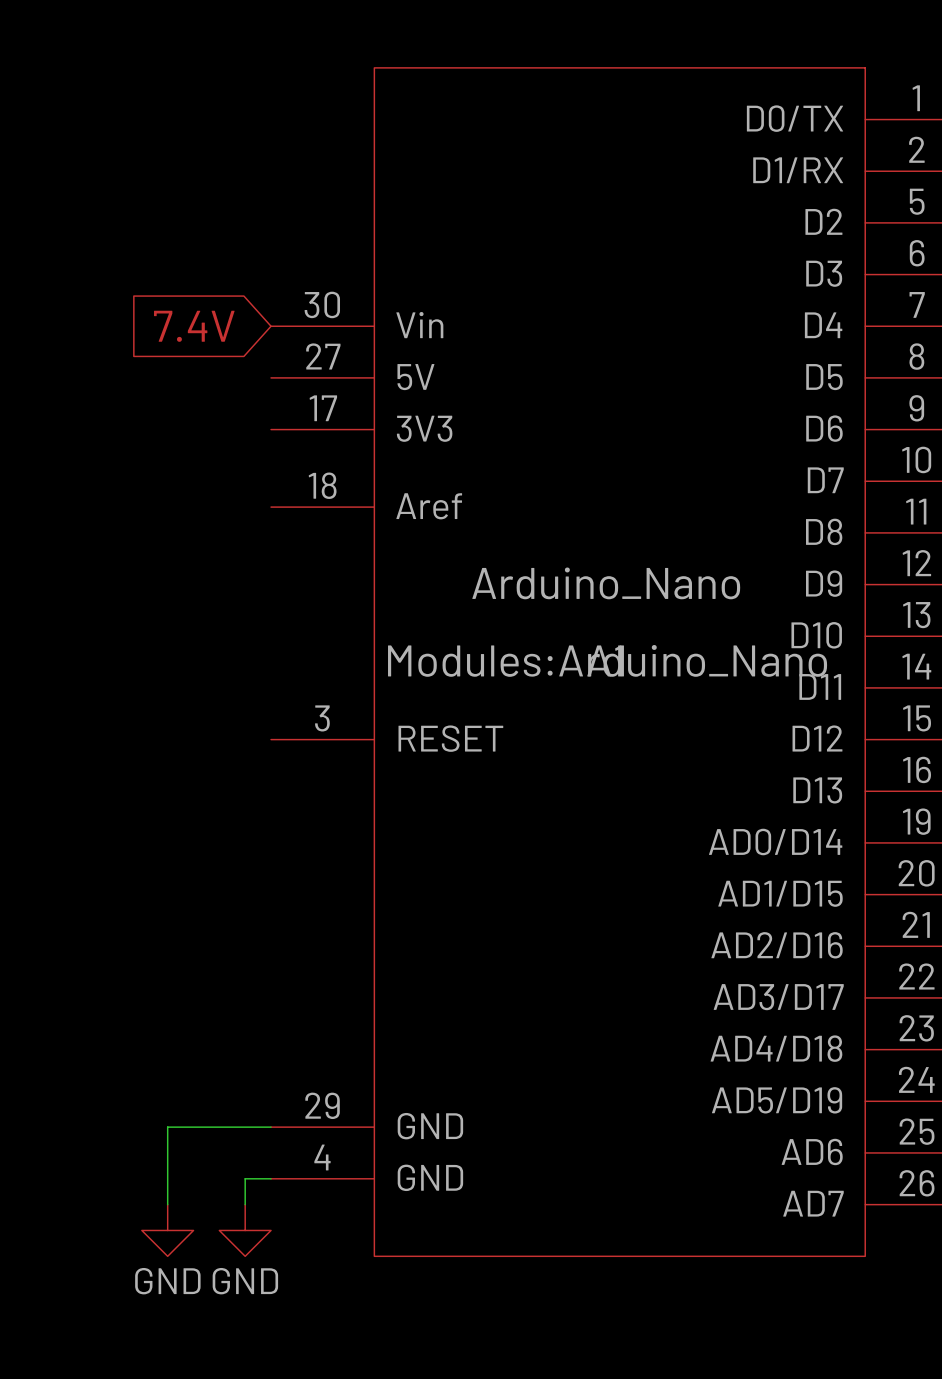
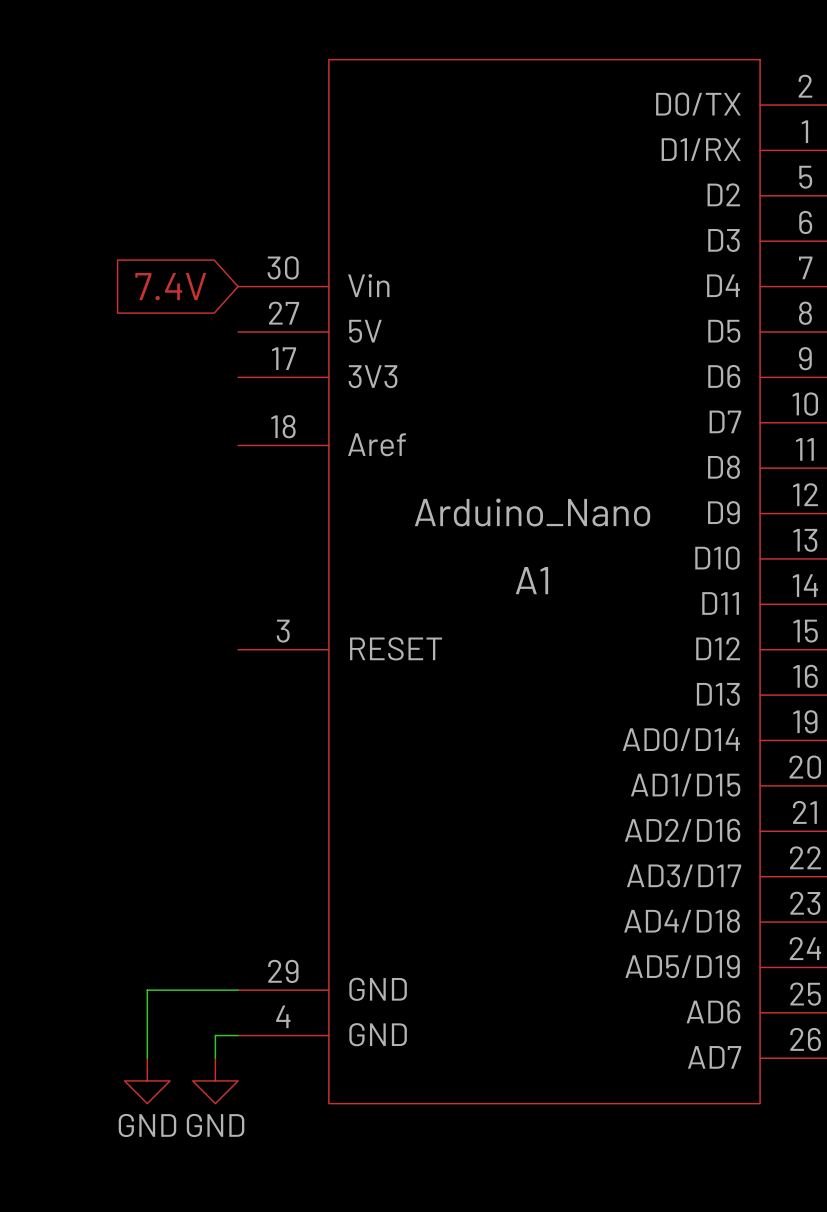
A1 pin number: 1 (916, 98) -> 2 (805, 86)
A1 pin number: 2 (916, 149) -> 1 (804, 131)
A1 text: Modules:Arduino_Nano (607, 660) -> none

